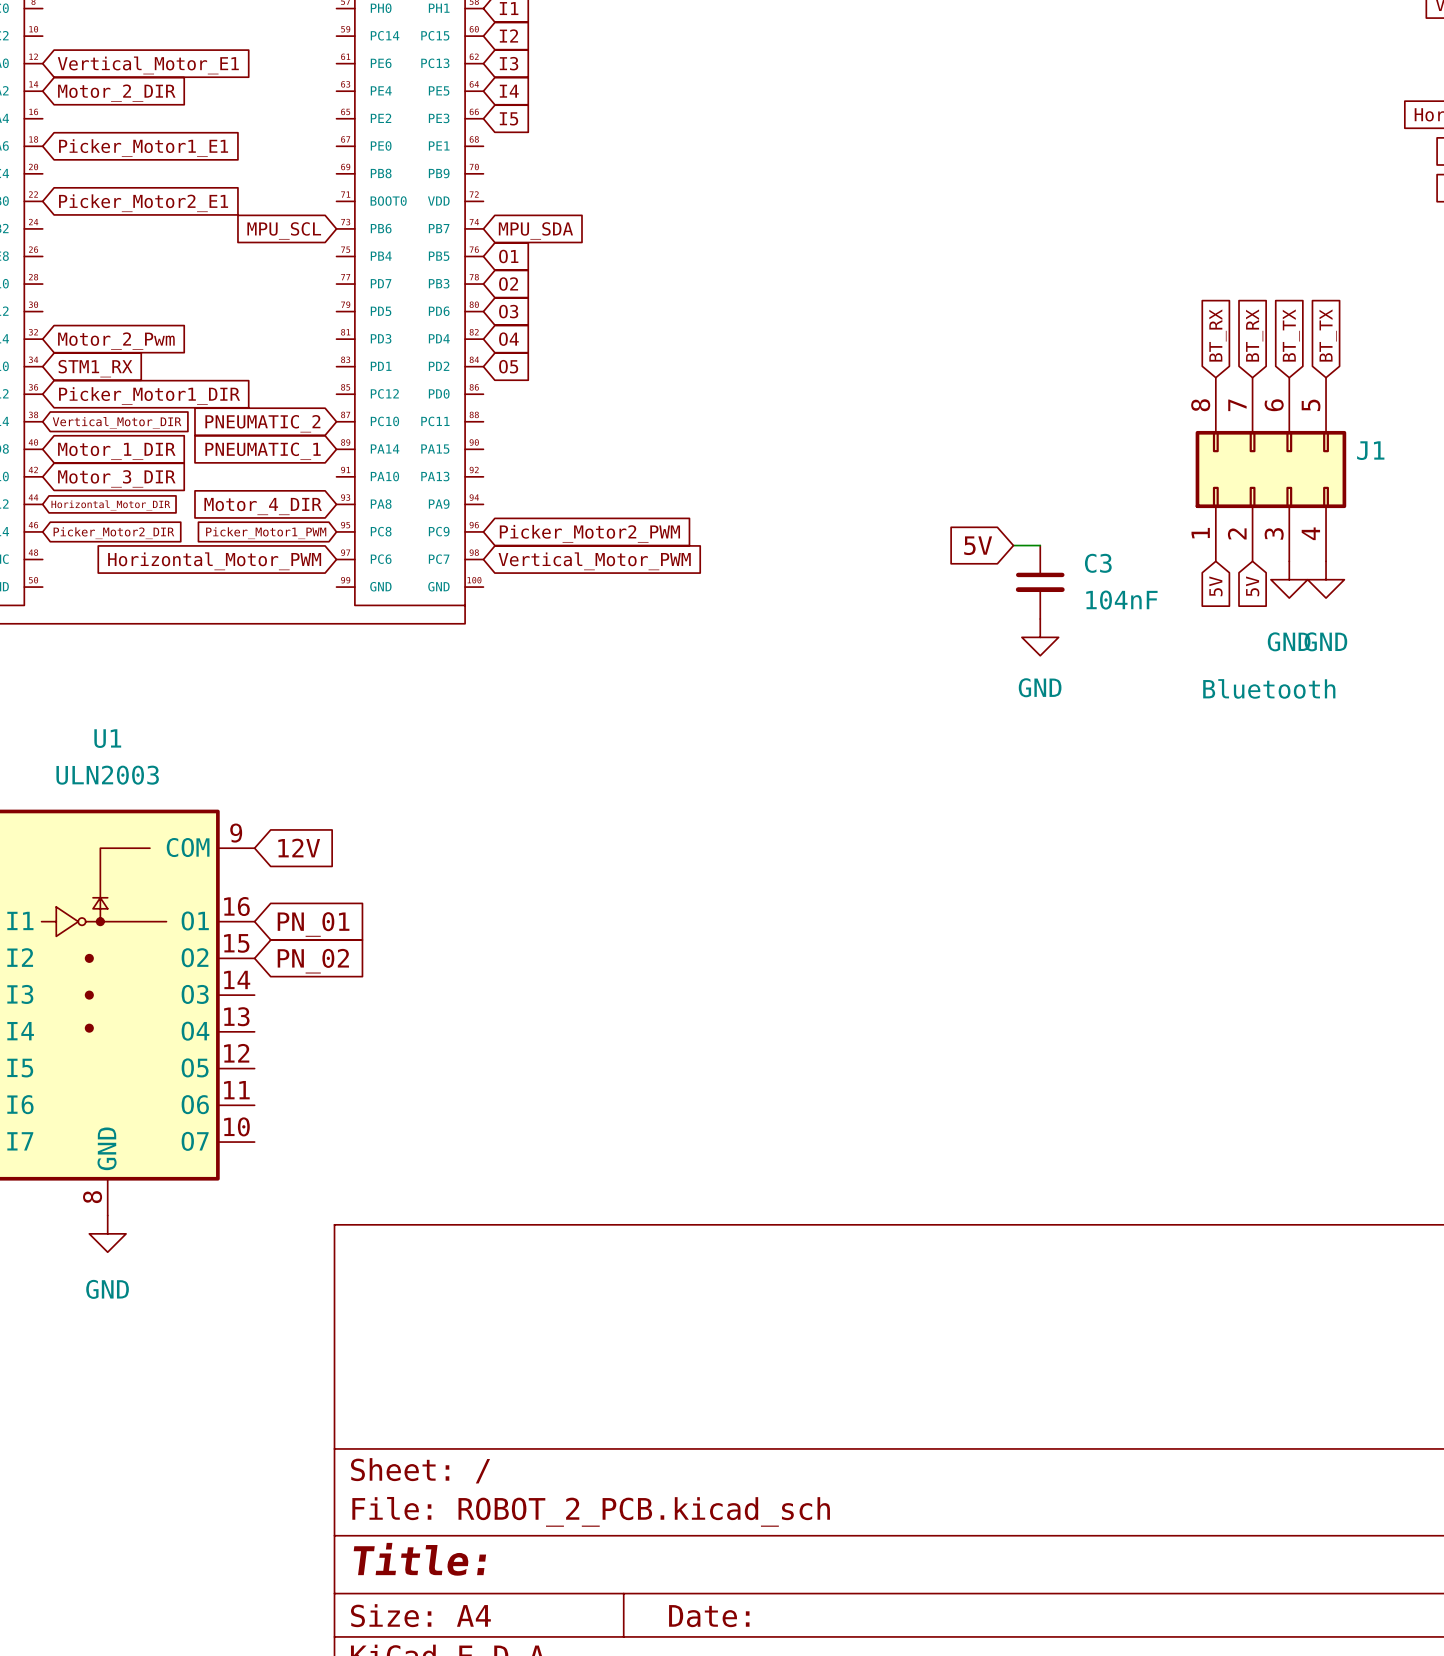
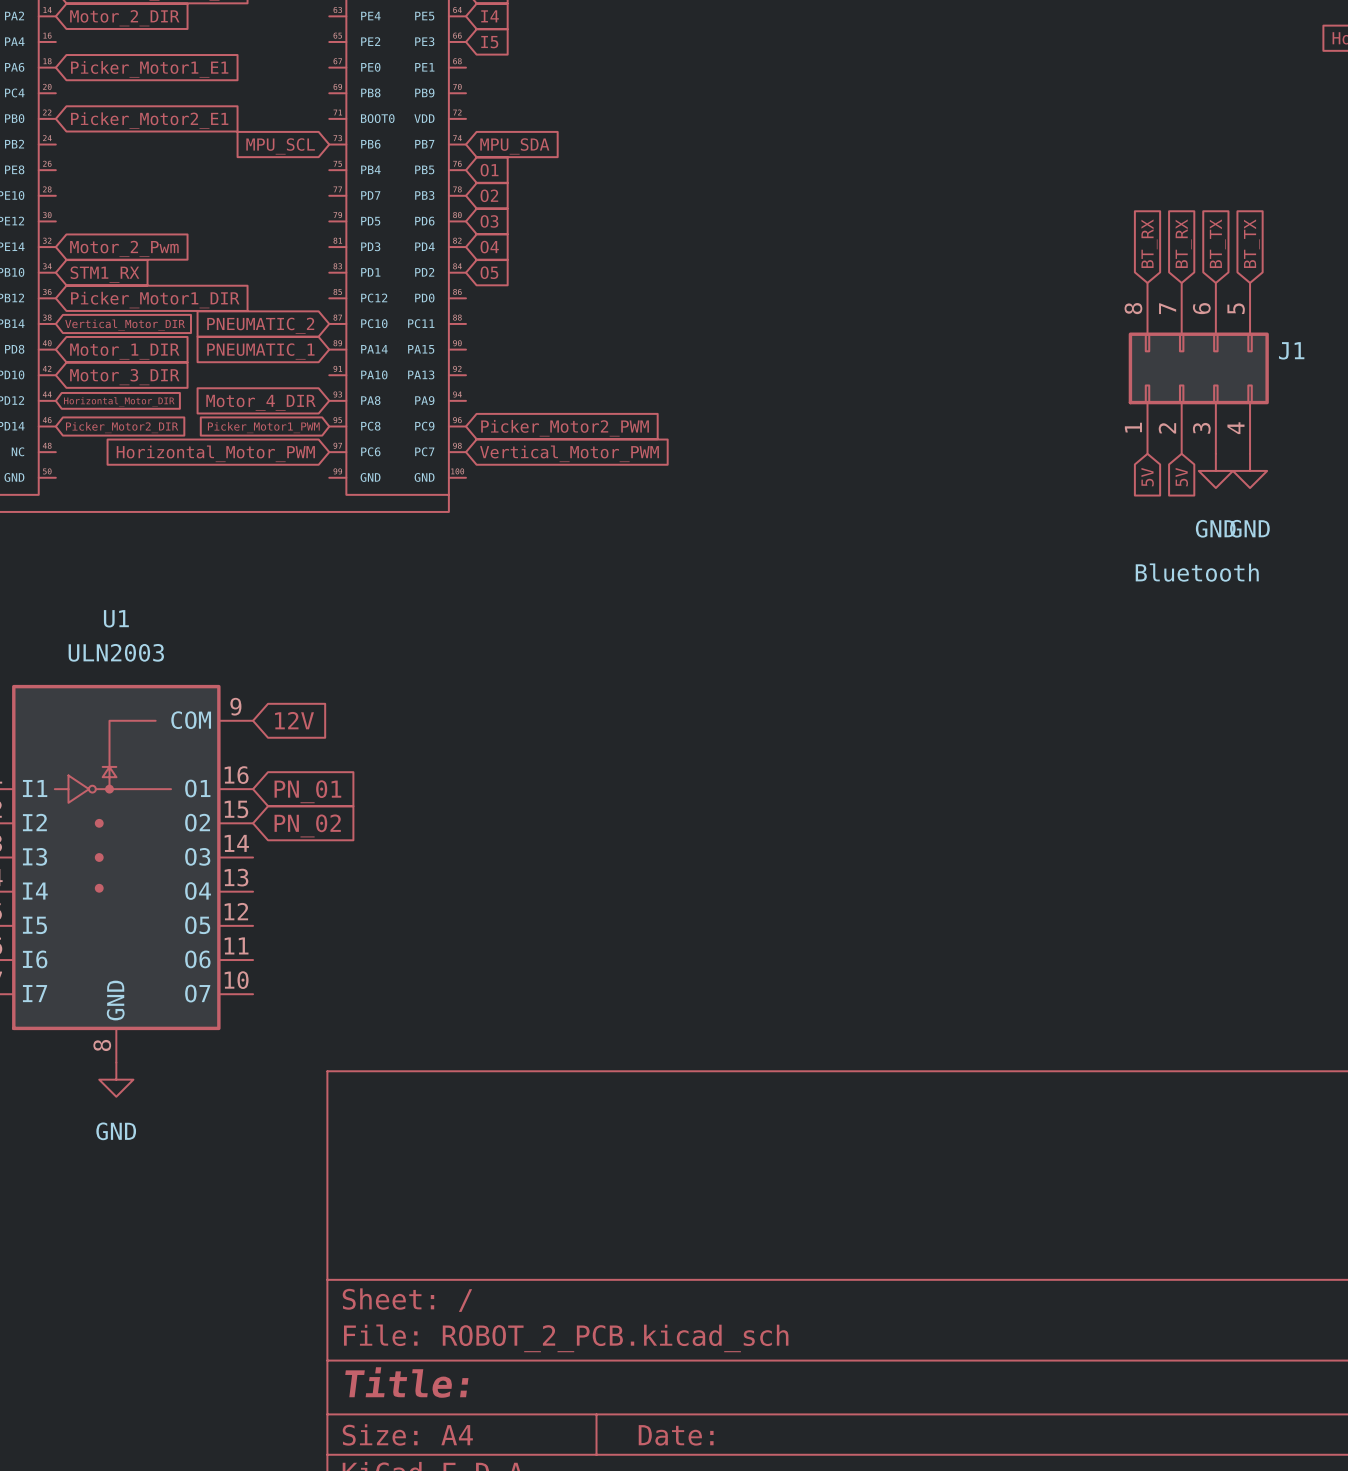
global label: 5V (978, 545) -> none
wire: (1013, 545) (1040, 545) -> none
C3: 104nF (1040, 582) -> none
power symbol: GND (1040, 637) -> none

